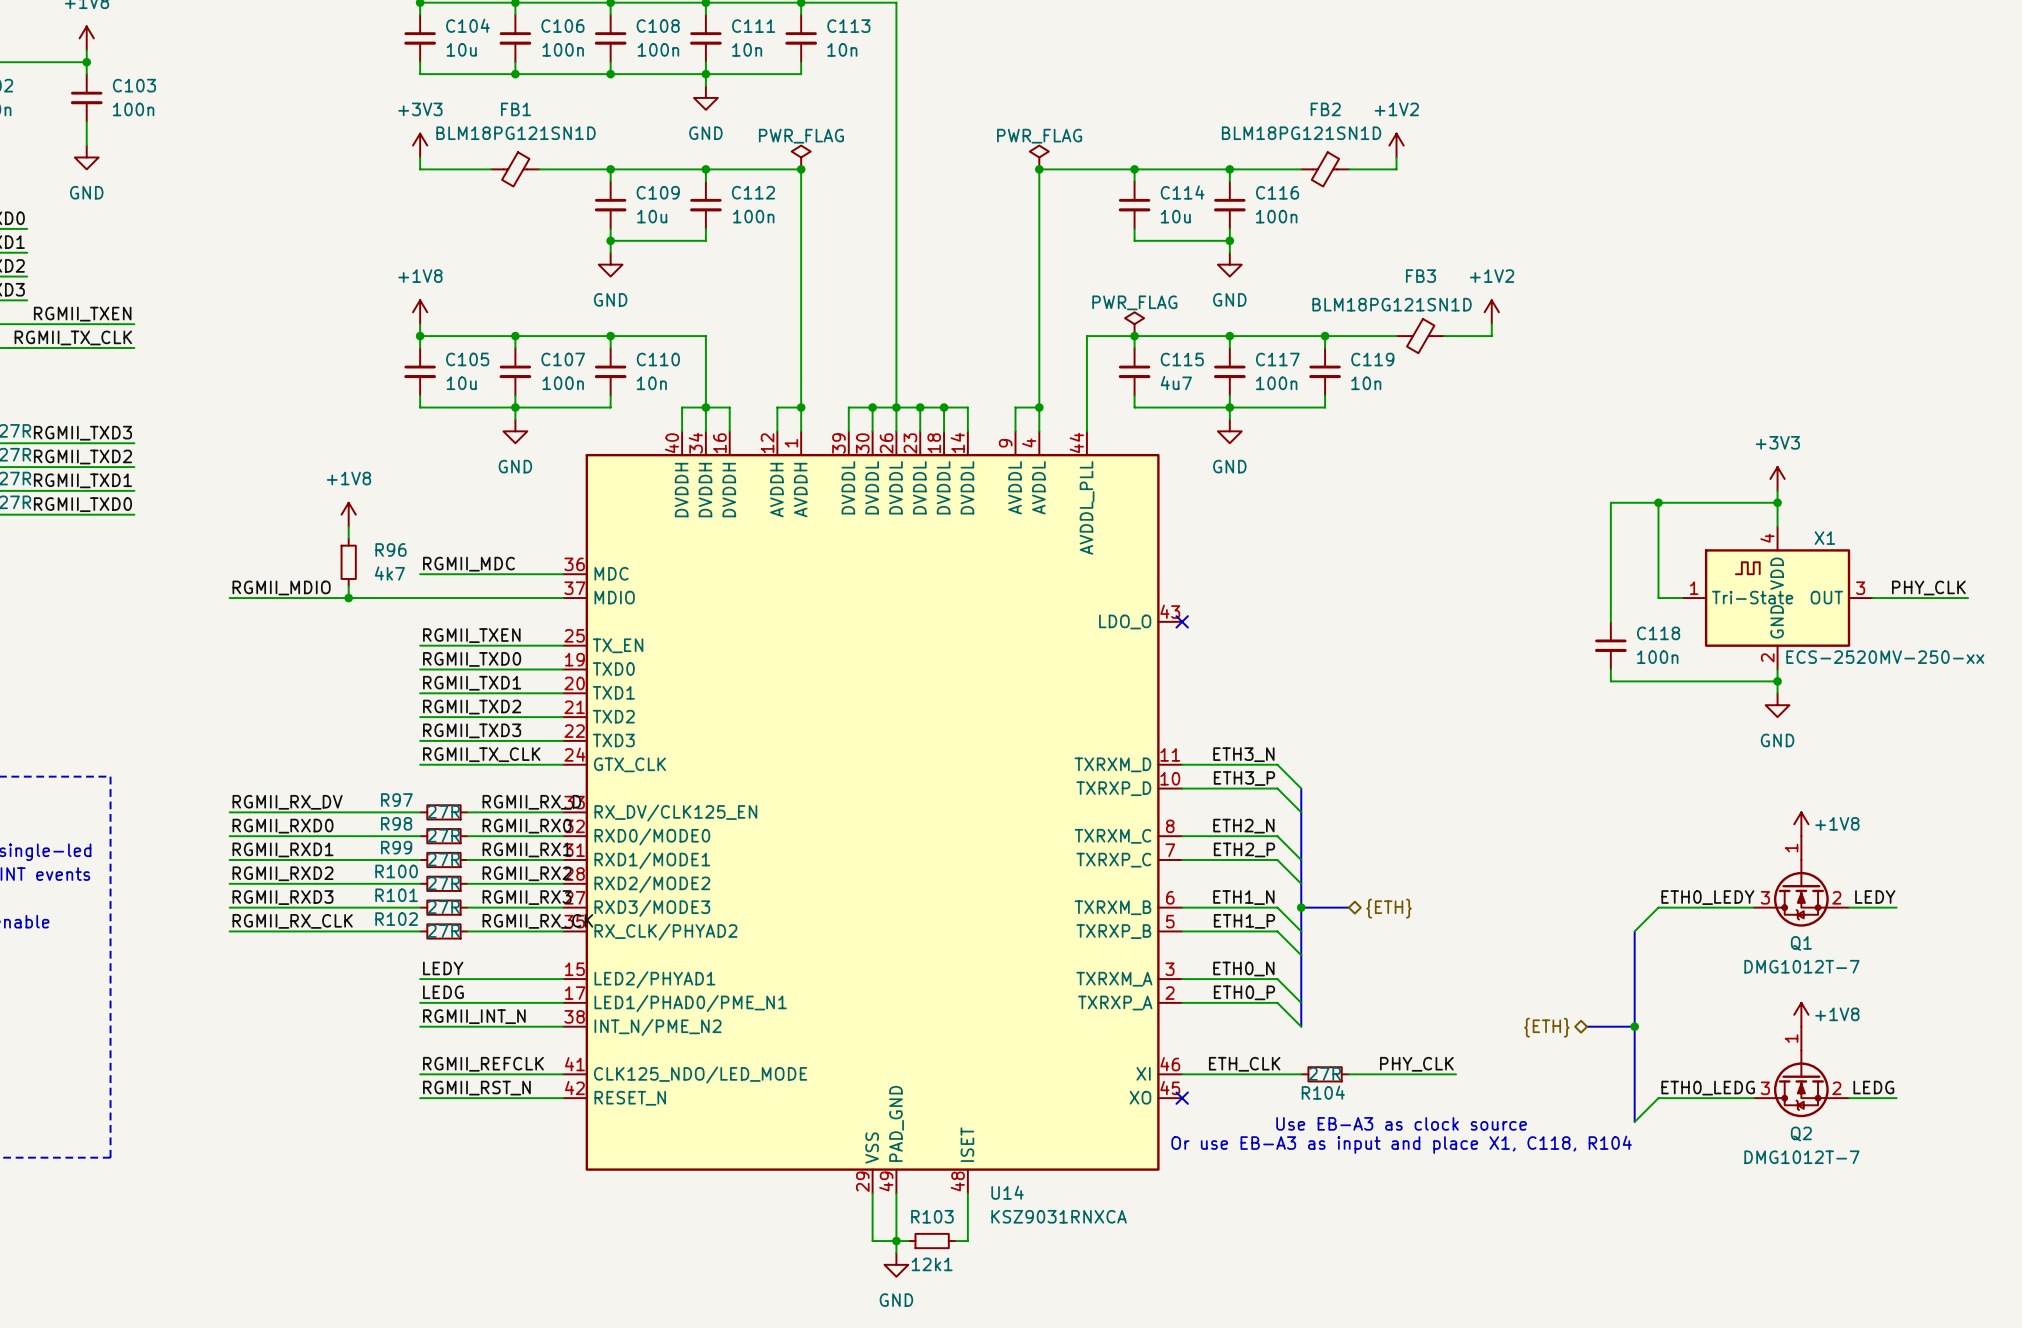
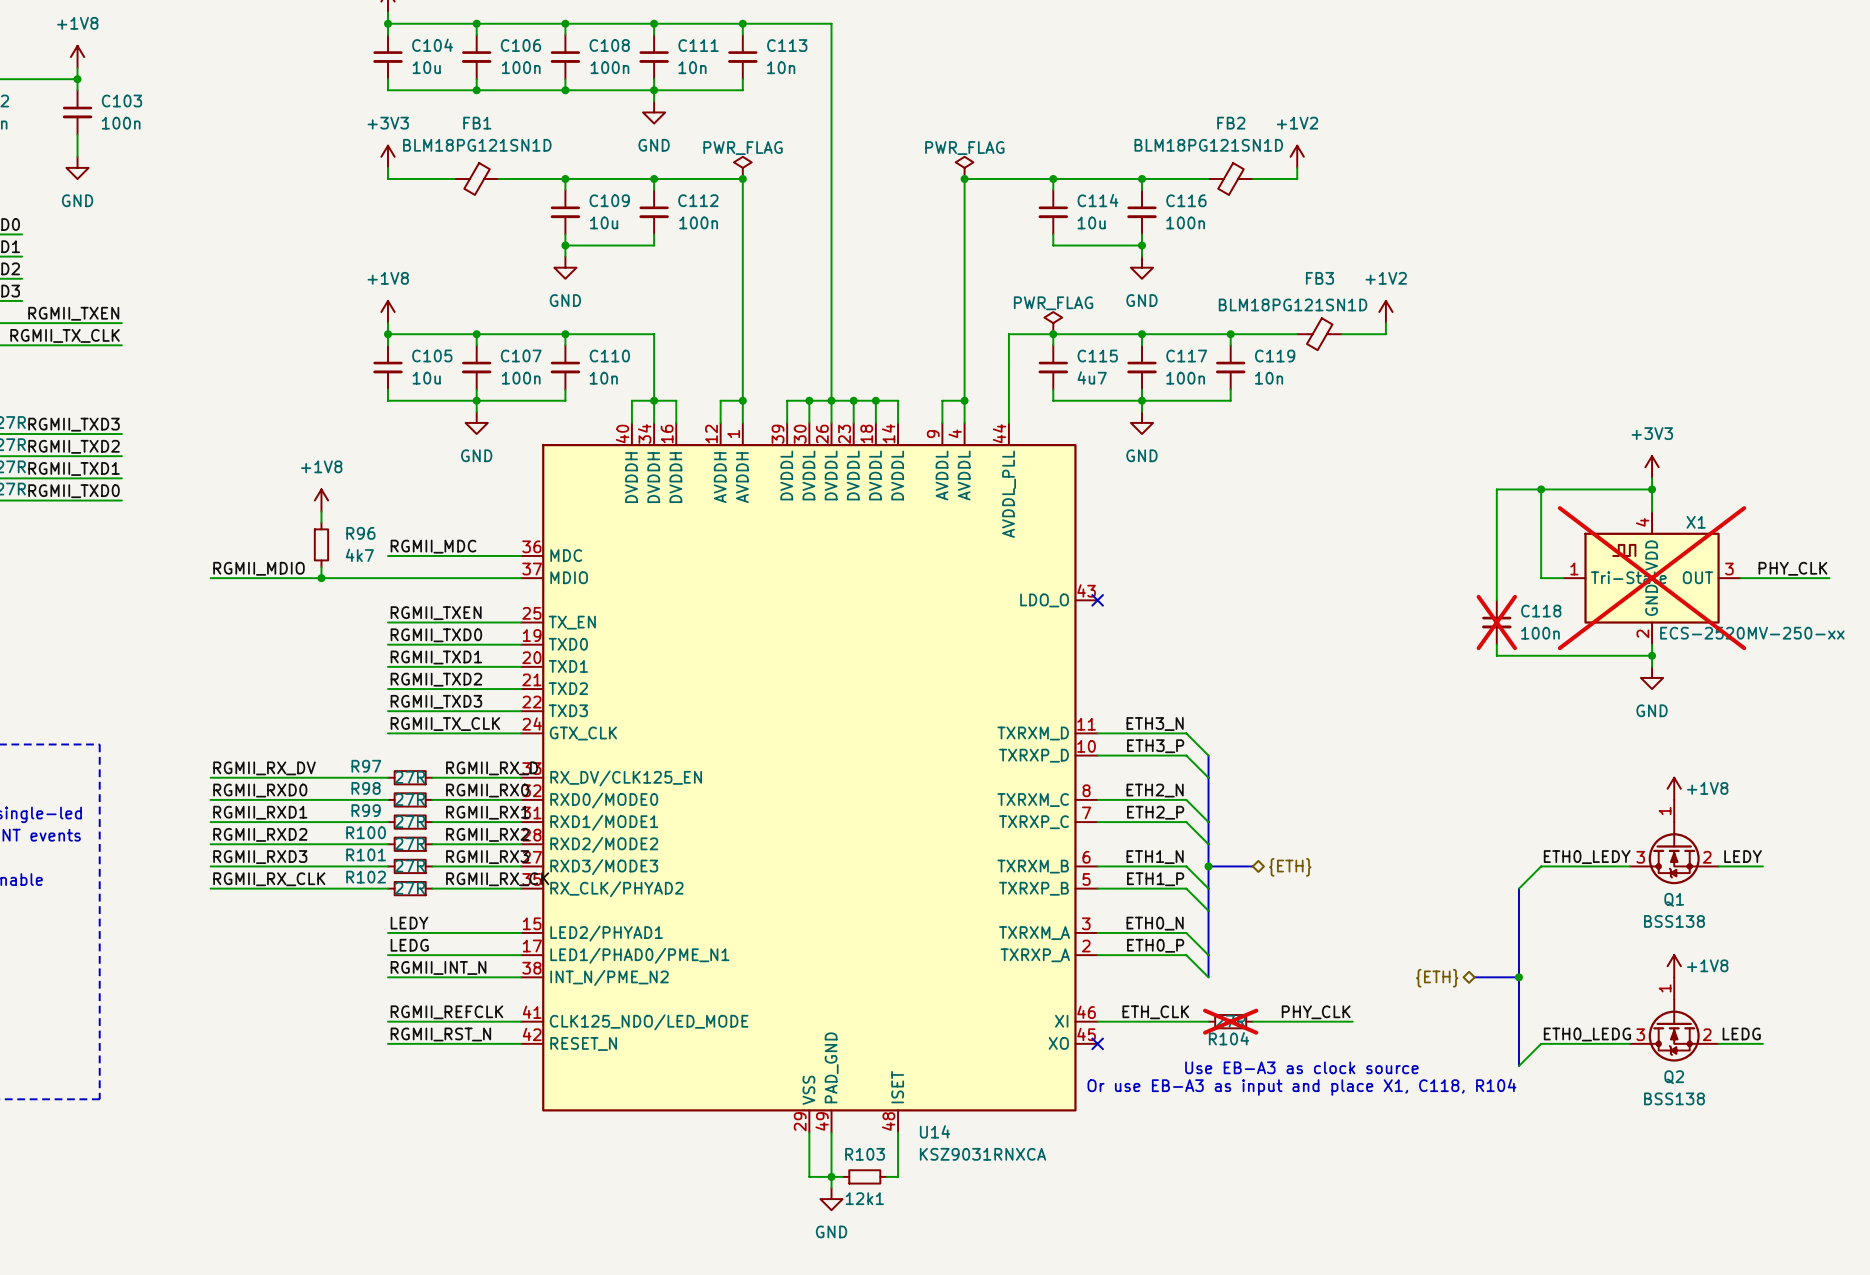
X1 do-not-place cross: none -> (1652, 578)
C118 do-not-place cross: none -> (1496, 622)
Q1 value: DMG1012T-7 (1801, 966) -> BSS138 (1674, 921)
R104 do-not-place cross: none -> (1230, 1021)
Q2 value: DMG1012T-7 (1801, 1157) -> BSS138 (1674, 1098)

